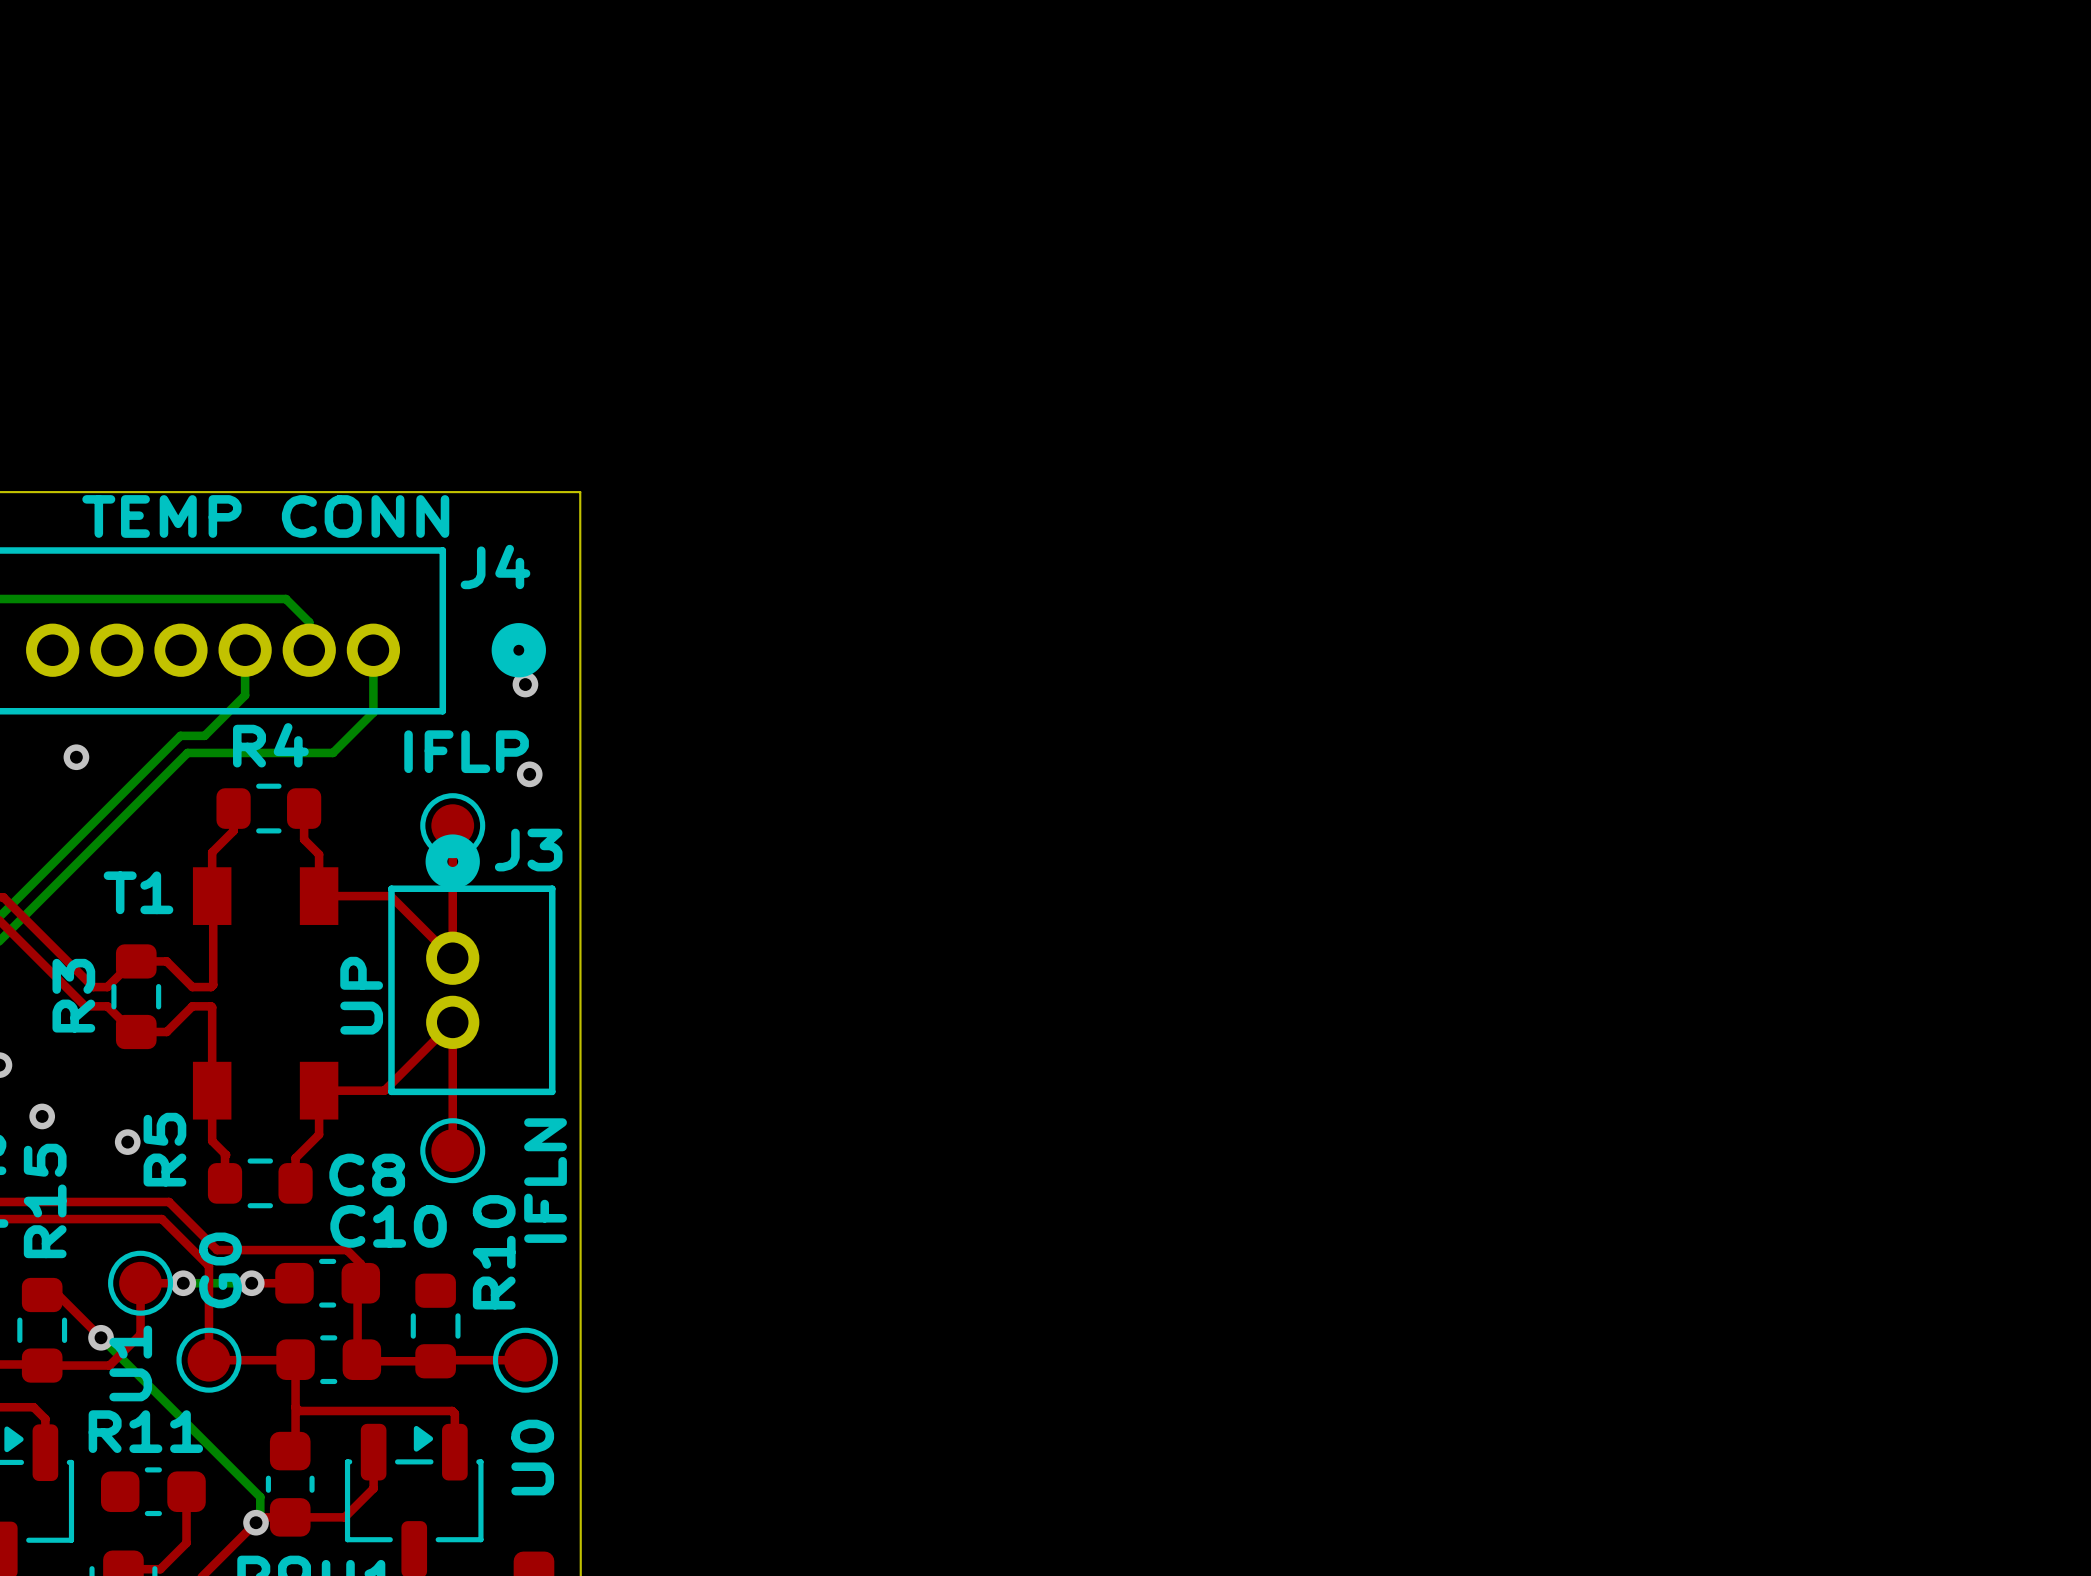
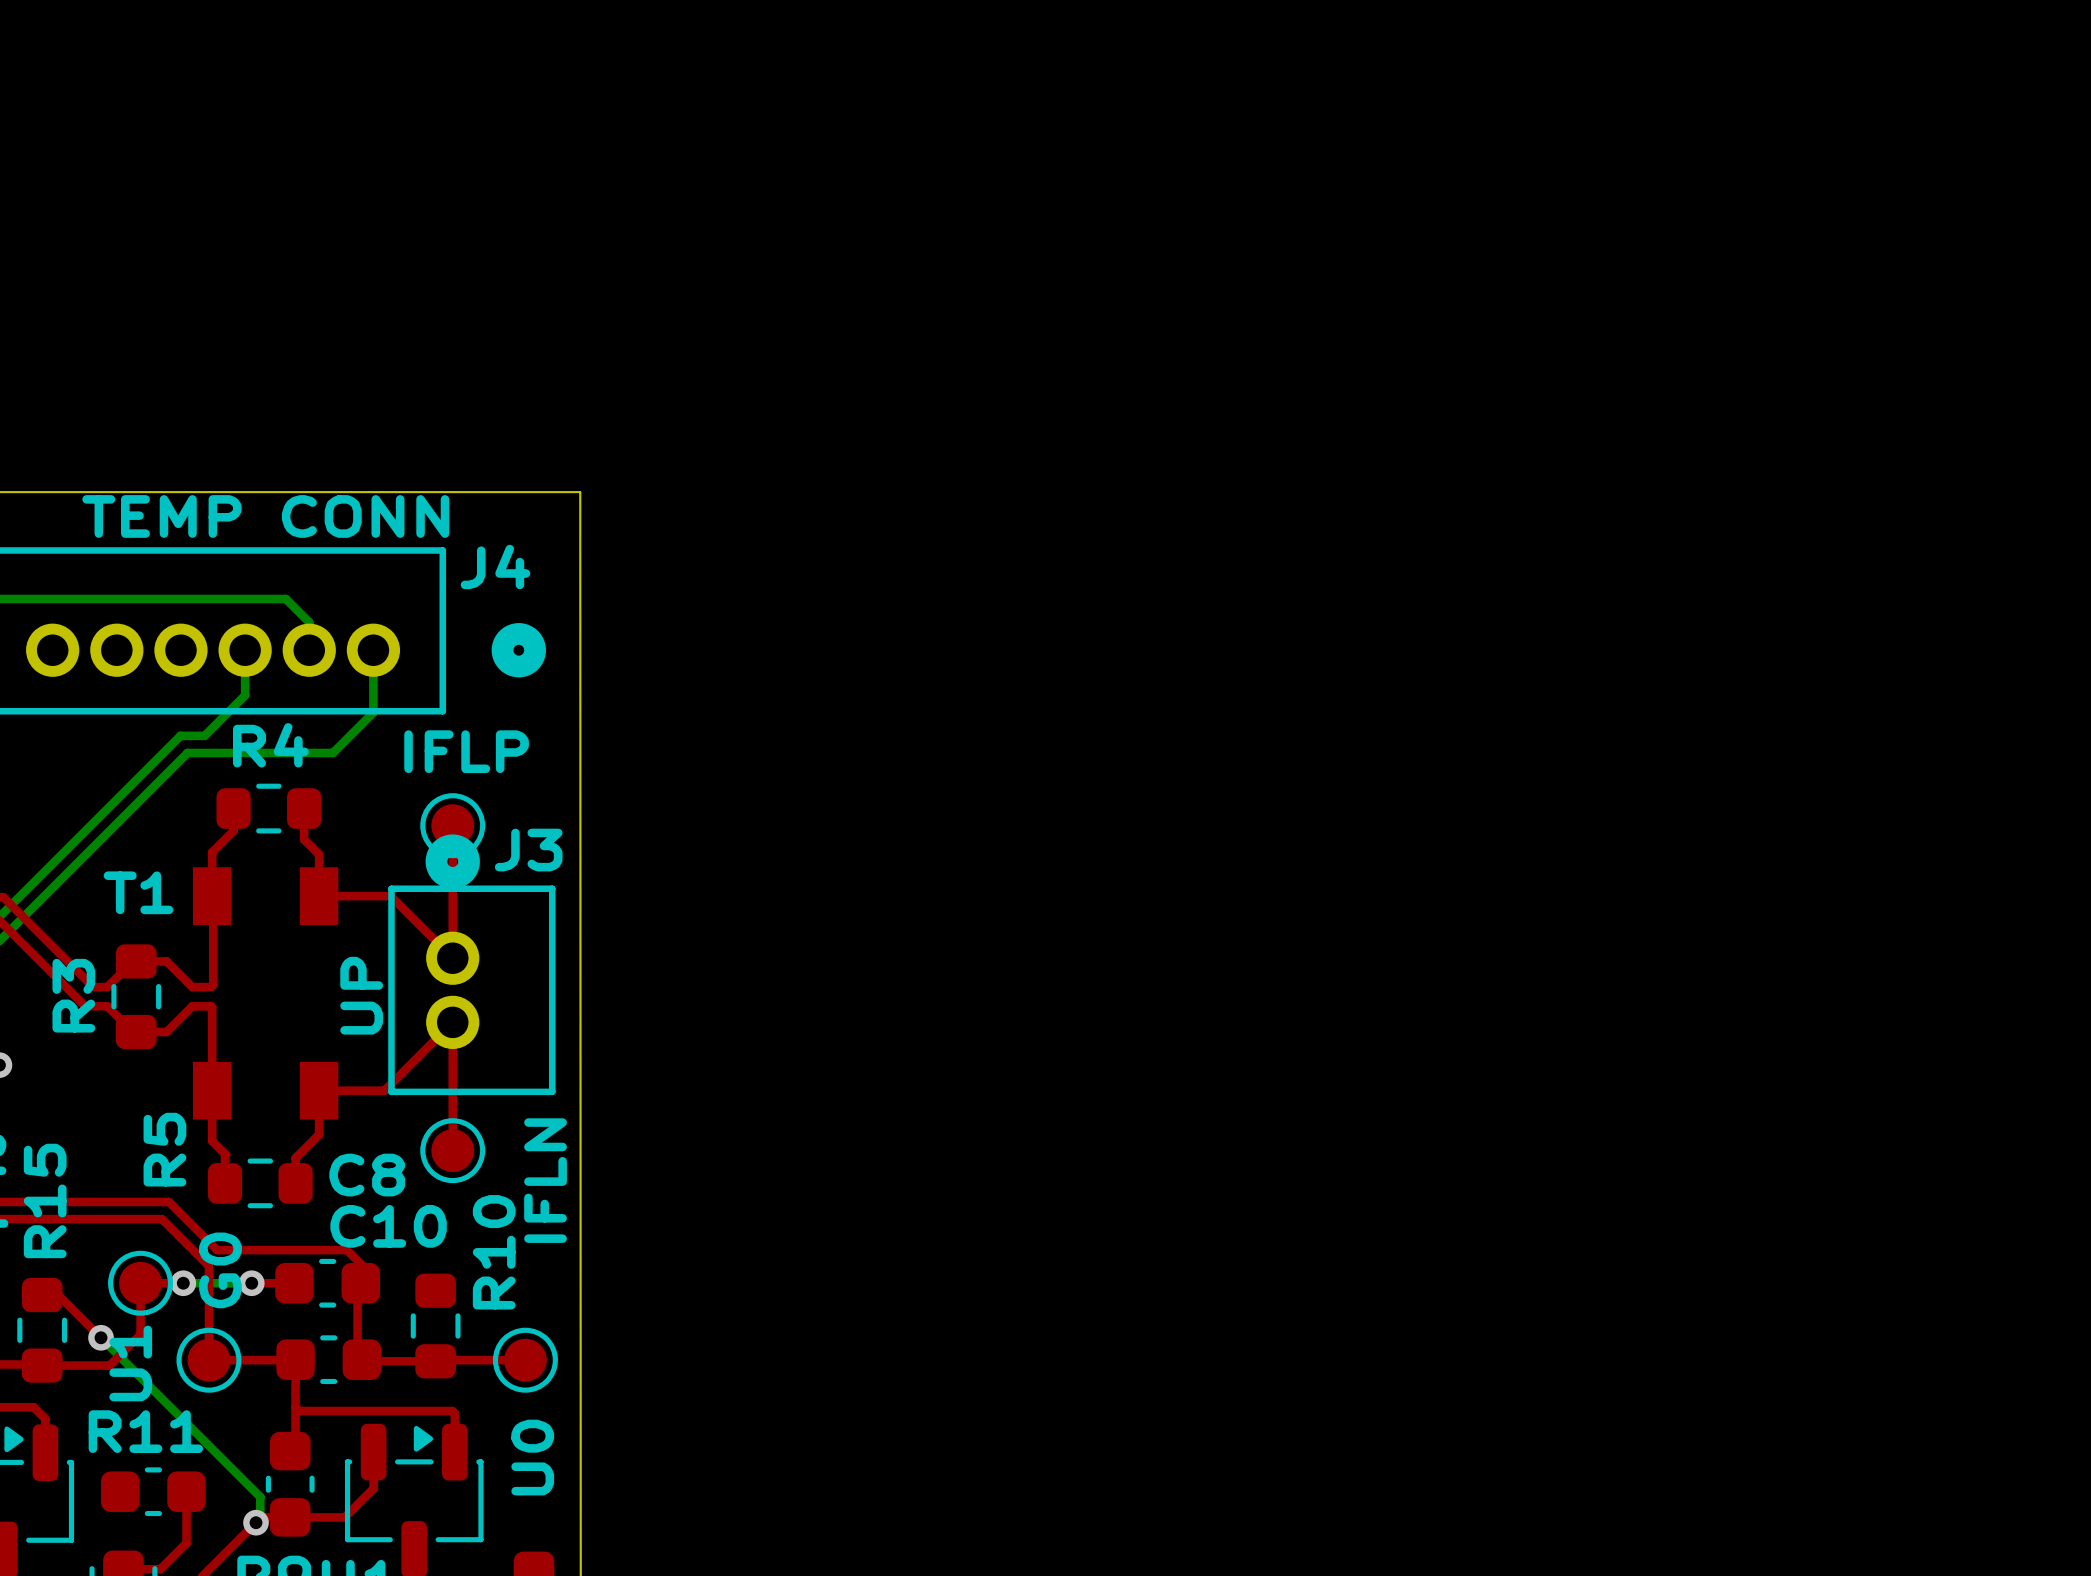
via: (525, 684) -> none
via: (76, 757) -> none
via: (529, 774) -> none
via: (42, 1116) -> none
via: (127, 1142) -> none

